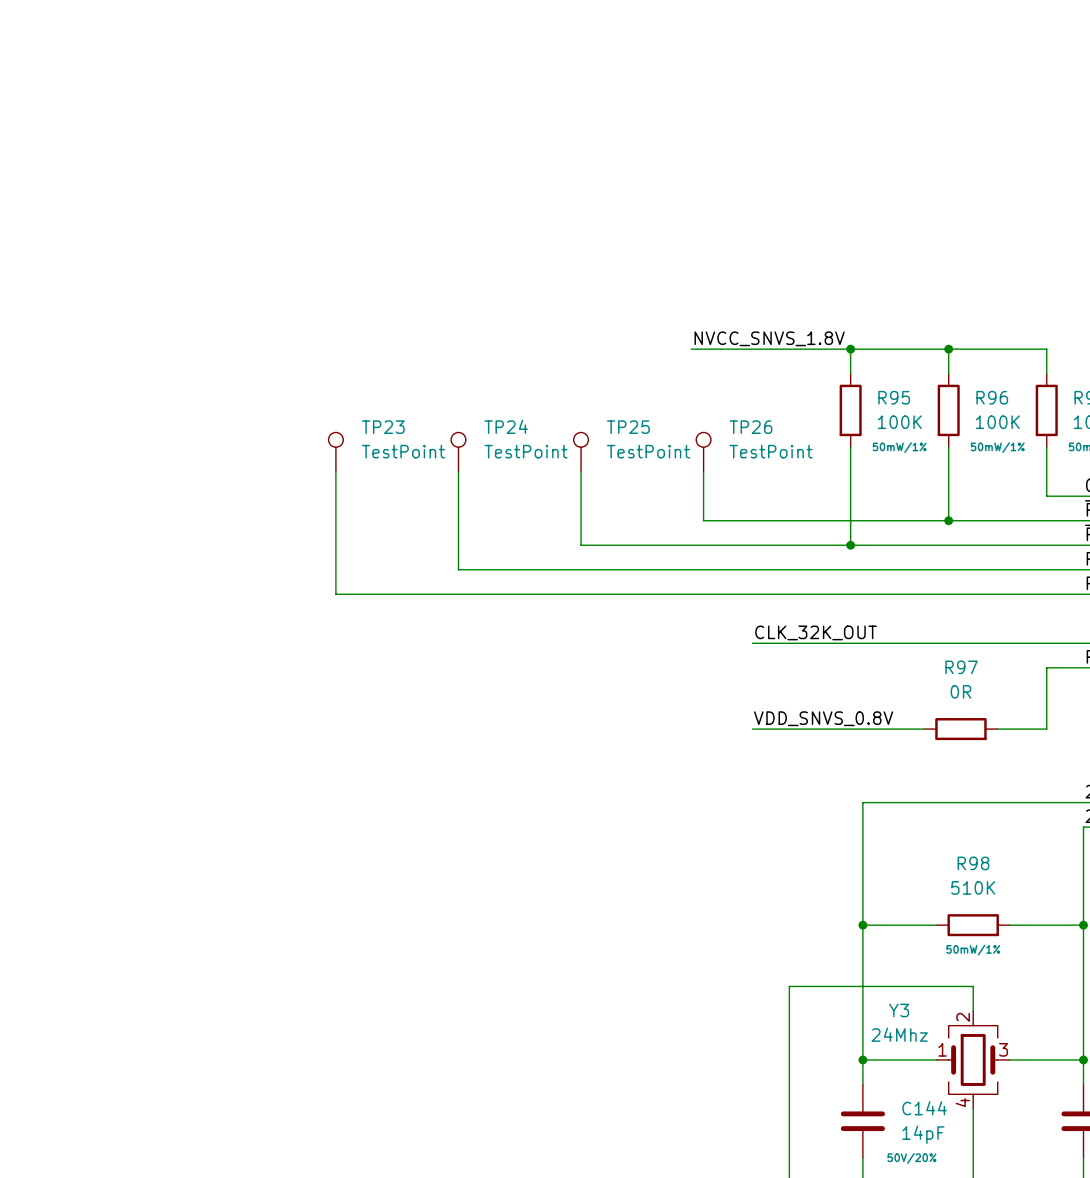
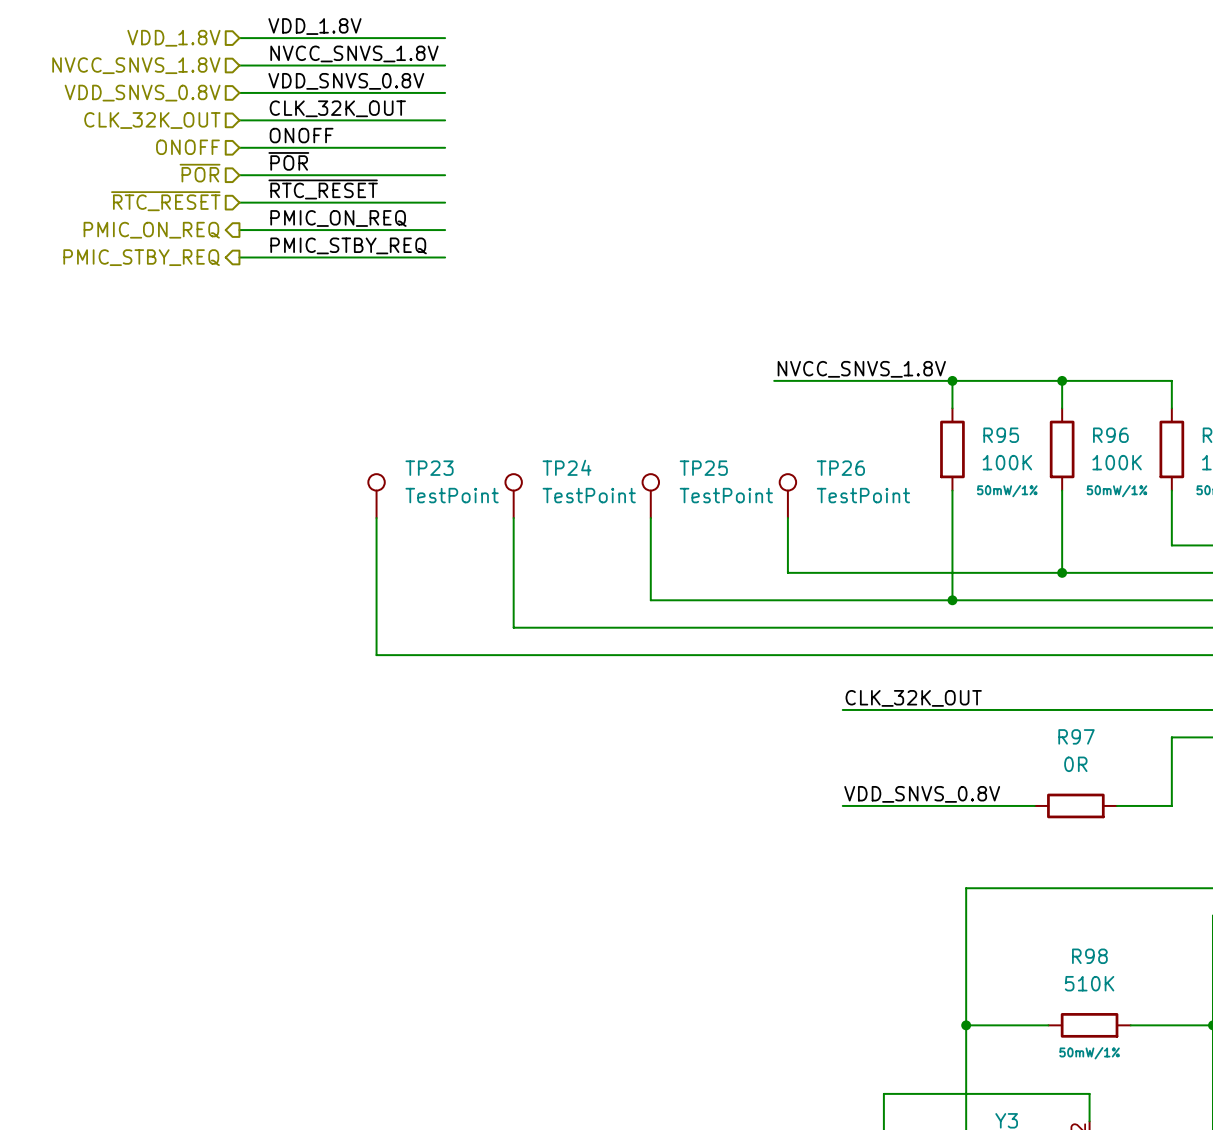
label: none -> VDD_1.8V (314, 26)
hierarchical label: none -> VDD_1.8V (173, 38)
wire: none -> (239, 38) (445, 38)
label: none -> NVCC_SNVS_1.8V (354, 53)
hierarchical label: none -> NVCC_SNVS_1.8V (136, 65)
wire: none -> (239, 65) (445, 65)
label: none -> VDD_SNVS_0.8V (346, 81)
hierarchical label: none -> VDD_SNVS_0.8V (142, 93)
wire: none -> (239, 92) (445, 92)
label: none -> CLK_32K_OUT (337, 108)
hierarchical label: none -> CLK_32K_OUT (152, 120)
wire: none -> (239, 120) (445, 120)
label: none -> ONOFF (301, 135)
hierarchical label: none -> ONOFF (187, 147)
wire: none -> (239, 147) (445, 147)
label: none -> ~{POR} (288, 161)
hierarchical label: none -> ~{POR} (200, 173)
wire: none -> (239, 175) (445, 175)
label: none -> ~{RTC_RESET} (323, 189)
hierarchical label: none -> ~{RTC_RESET} (165, 201)
wire: none -> (239, 202) (445, 202)
label: none -> PMIC_ON_REQ (338, 218)
hierarchical label: none -> PMIC_ON_REQ (151, 230)
wire: none -> (239, 230) (445, 230)
label: none -> PMIC_STBY_REQ (348, 245)
hierarchical label: none -> PMIC_STBY_REQ (141, 257)
wire: none -> (239, 257) (445, 257)

